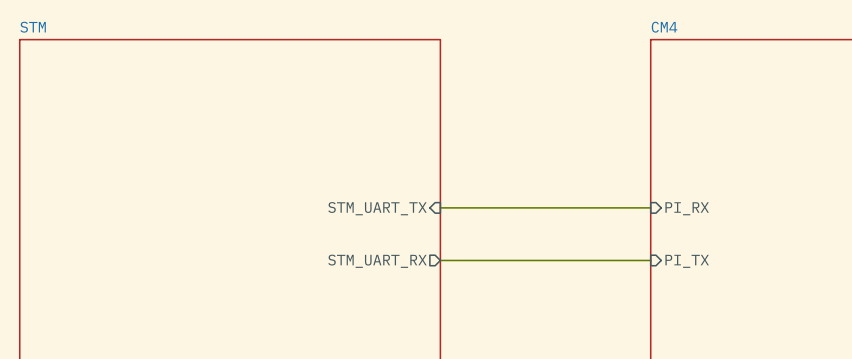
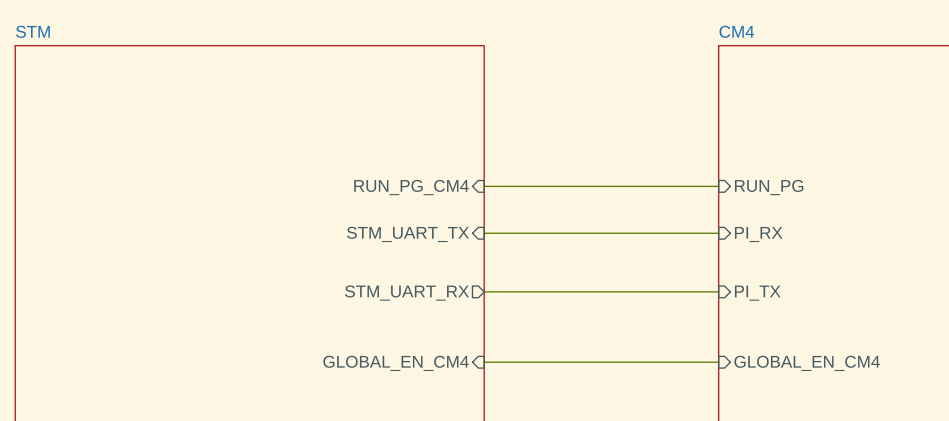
wire: none -> (484, 186) (718, 186)
sheet pin: none -> RUN_PG_CM4 (411, 187)
sheet pin: none -> RUN_PG (769, 187)
wire: none -> (484, 362) (718, 362)
sheet pin: none -> GLOBAL_EN_CM4 (396, 363)
sheet pin: none -> GLOBAL_EN_CM4 (807, 363)

